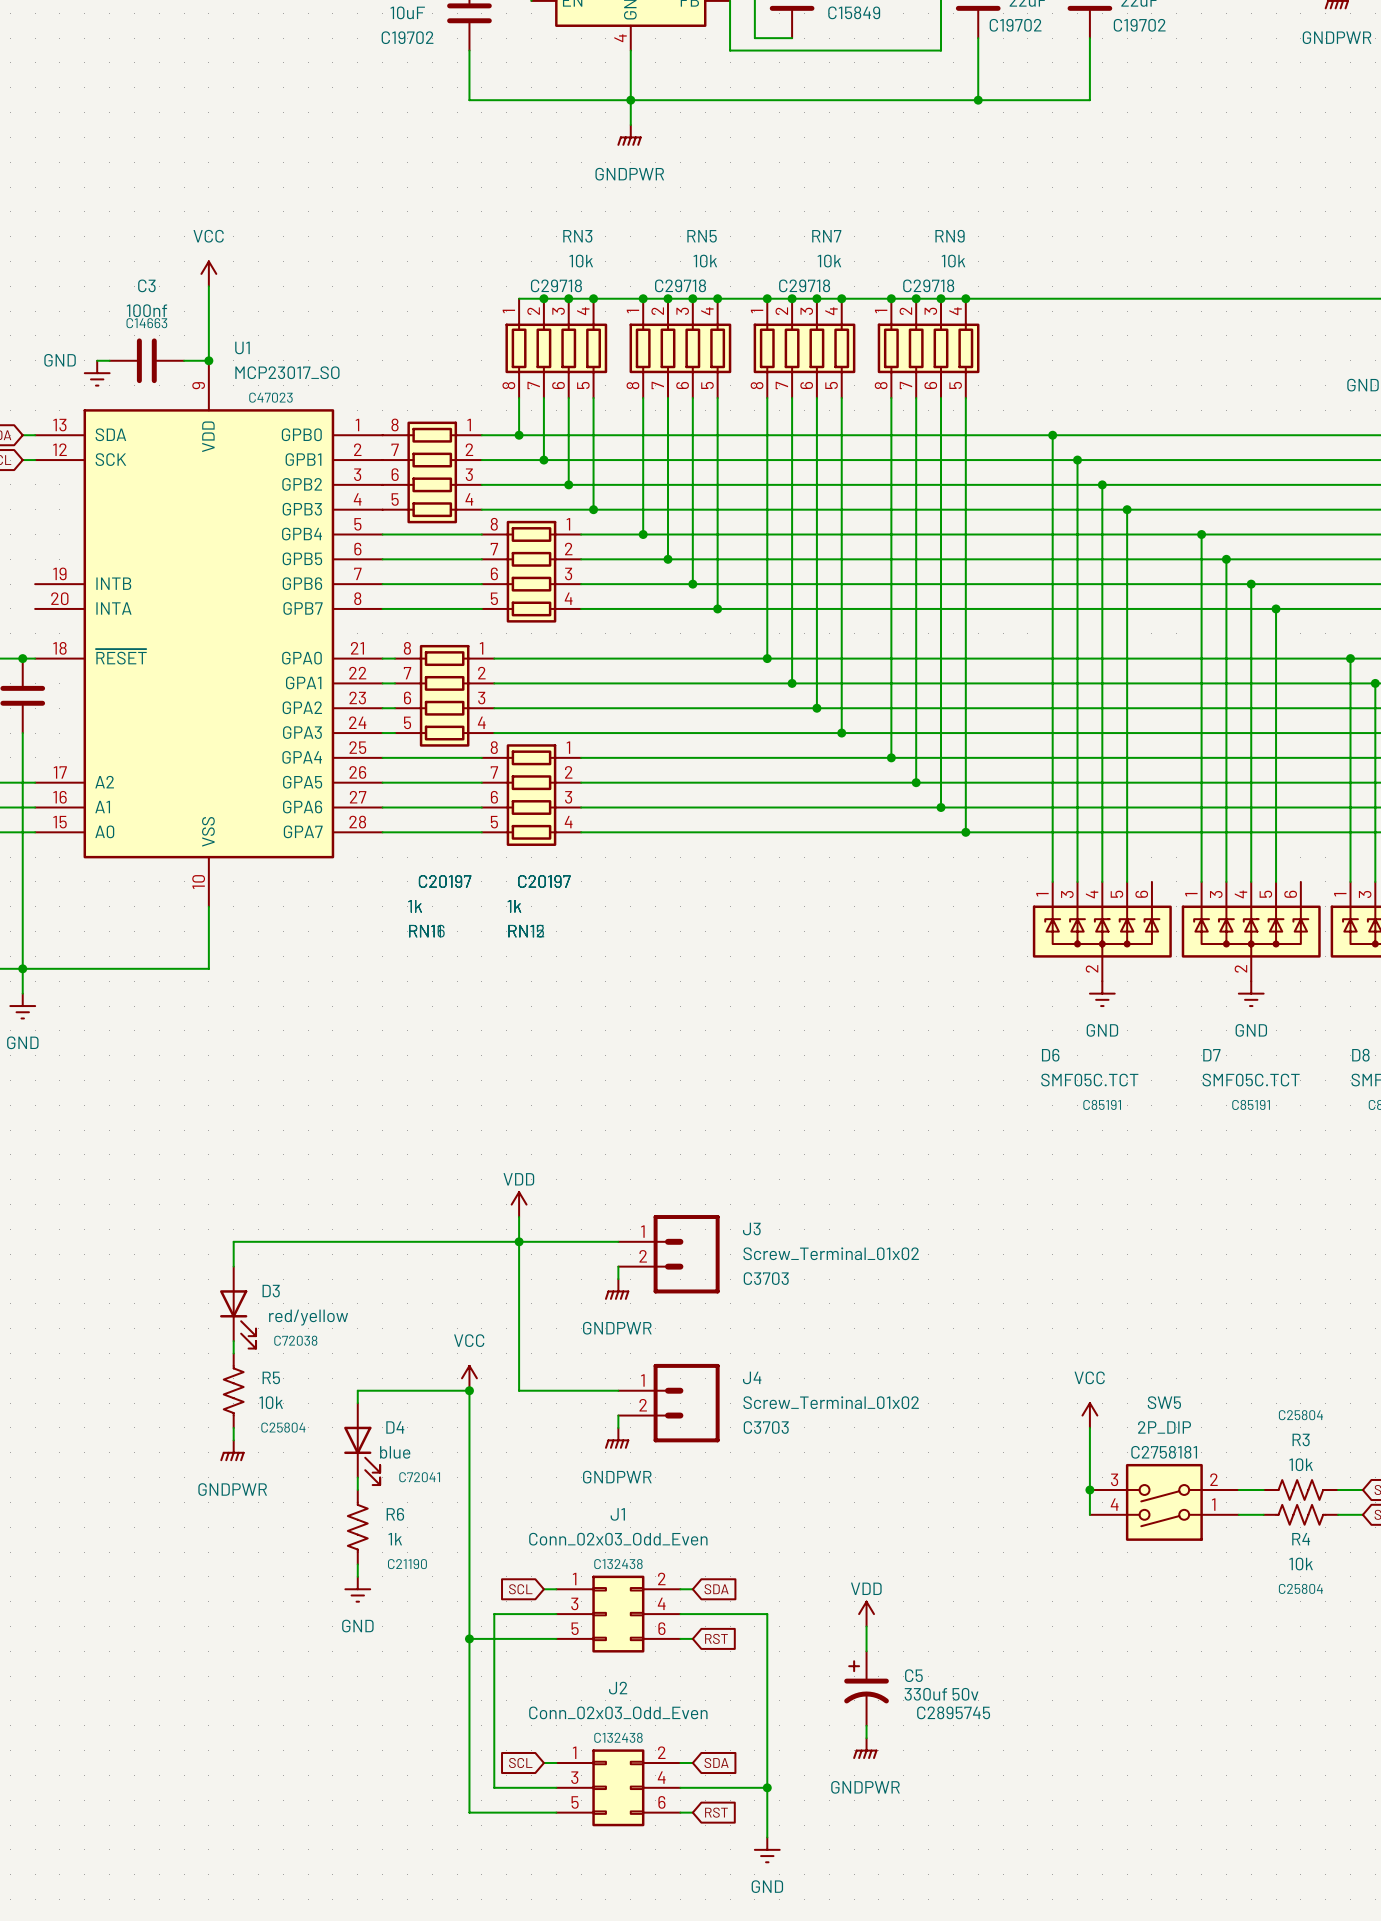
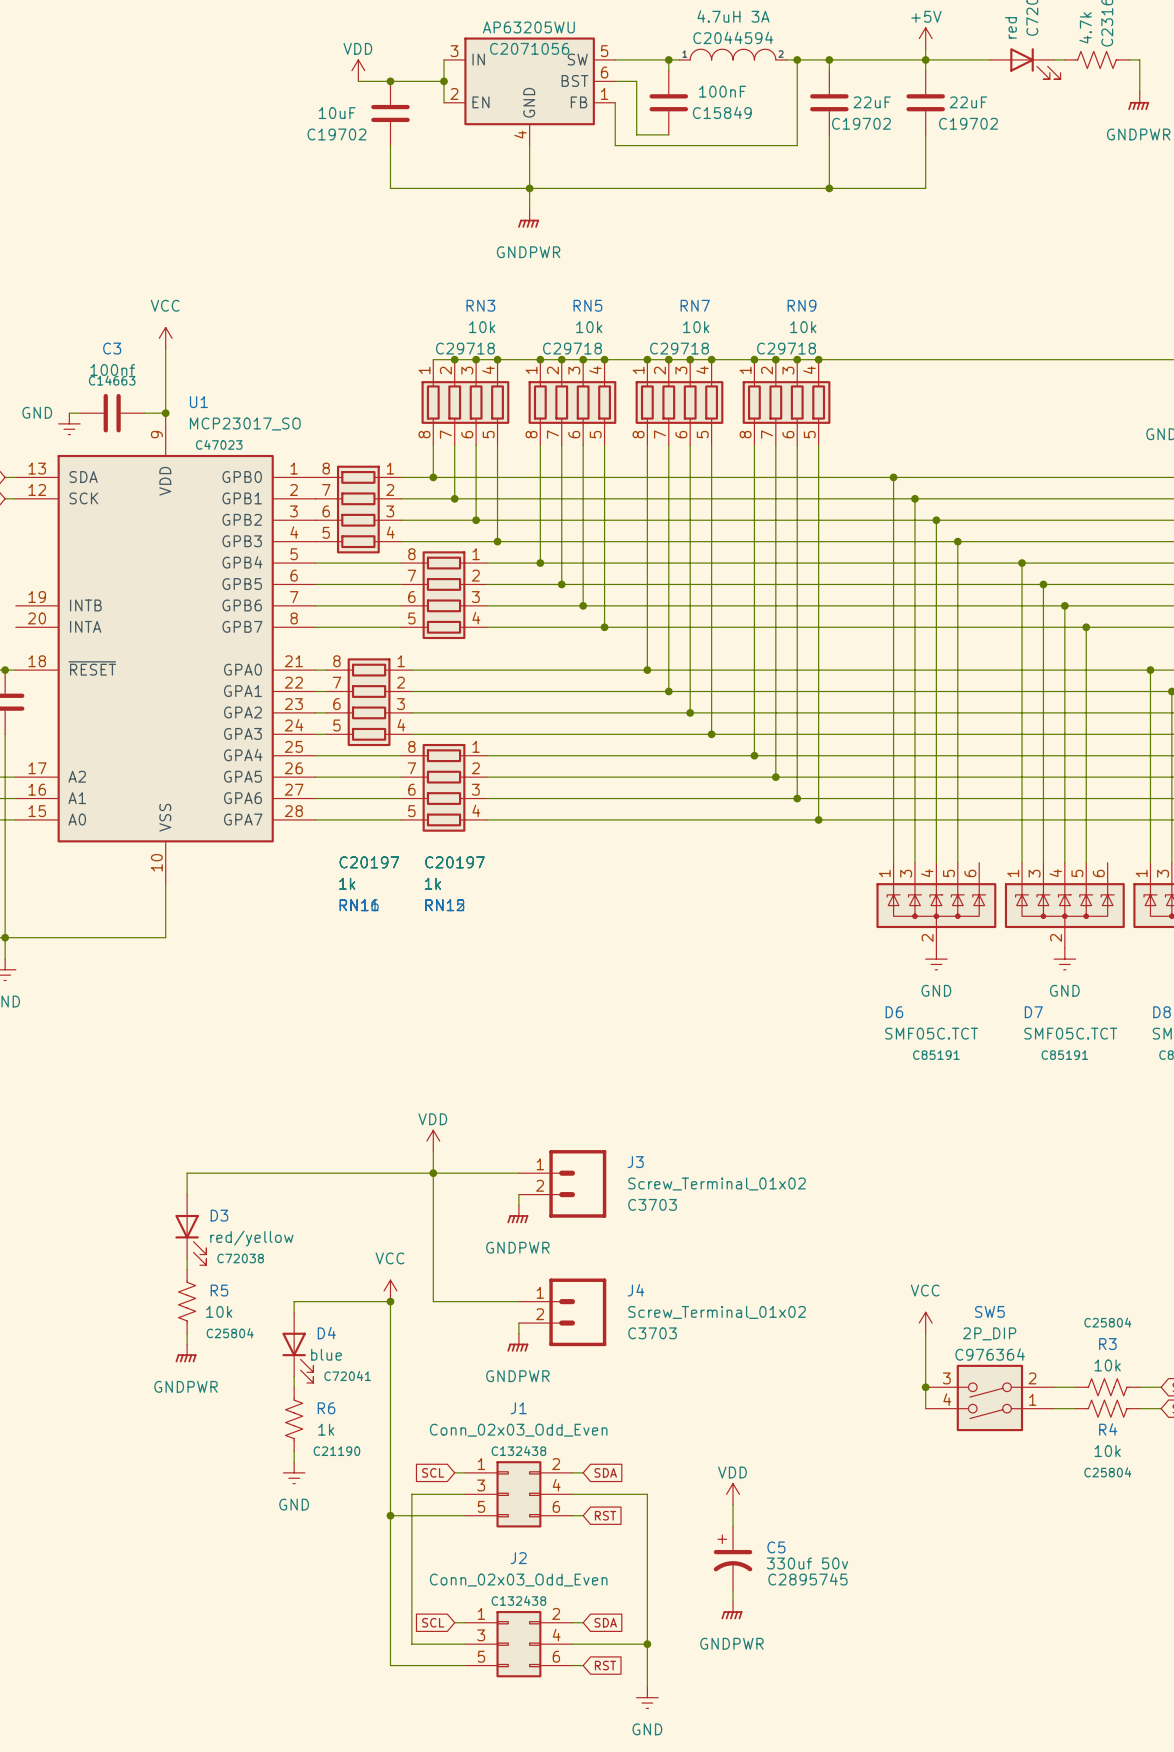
SW5 text: C2758181 (1164, 1452) -> C976364 (990, 1354)

